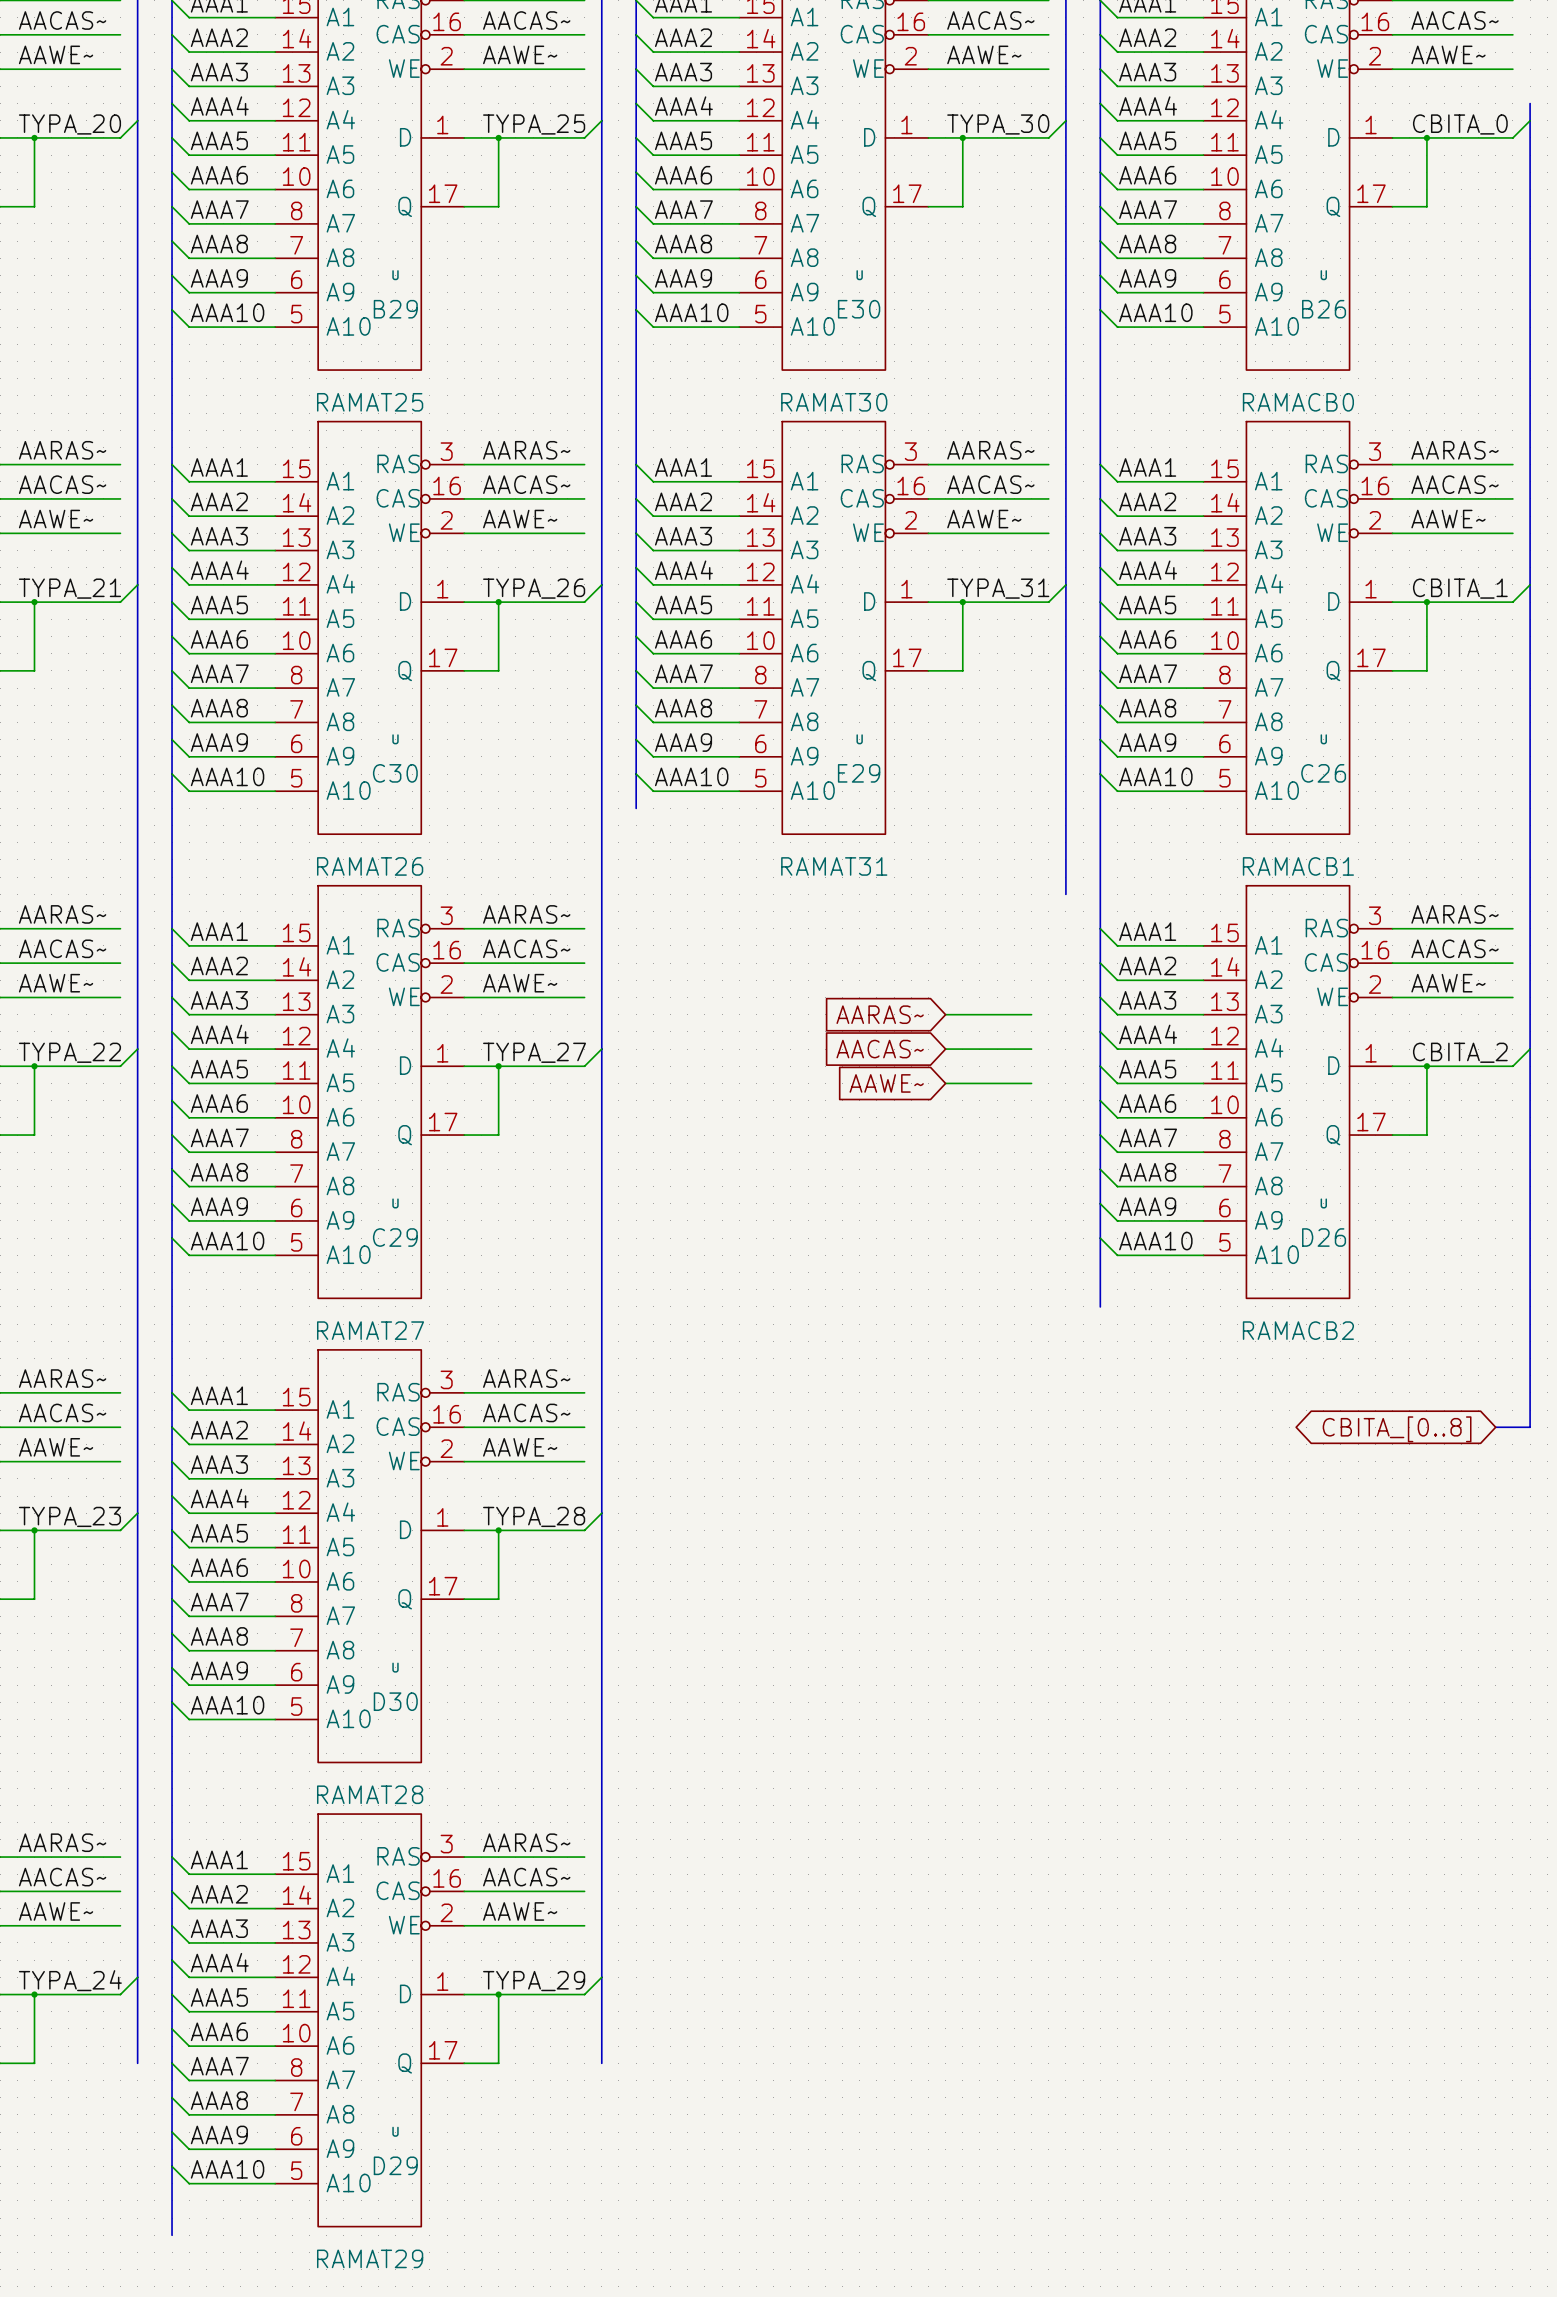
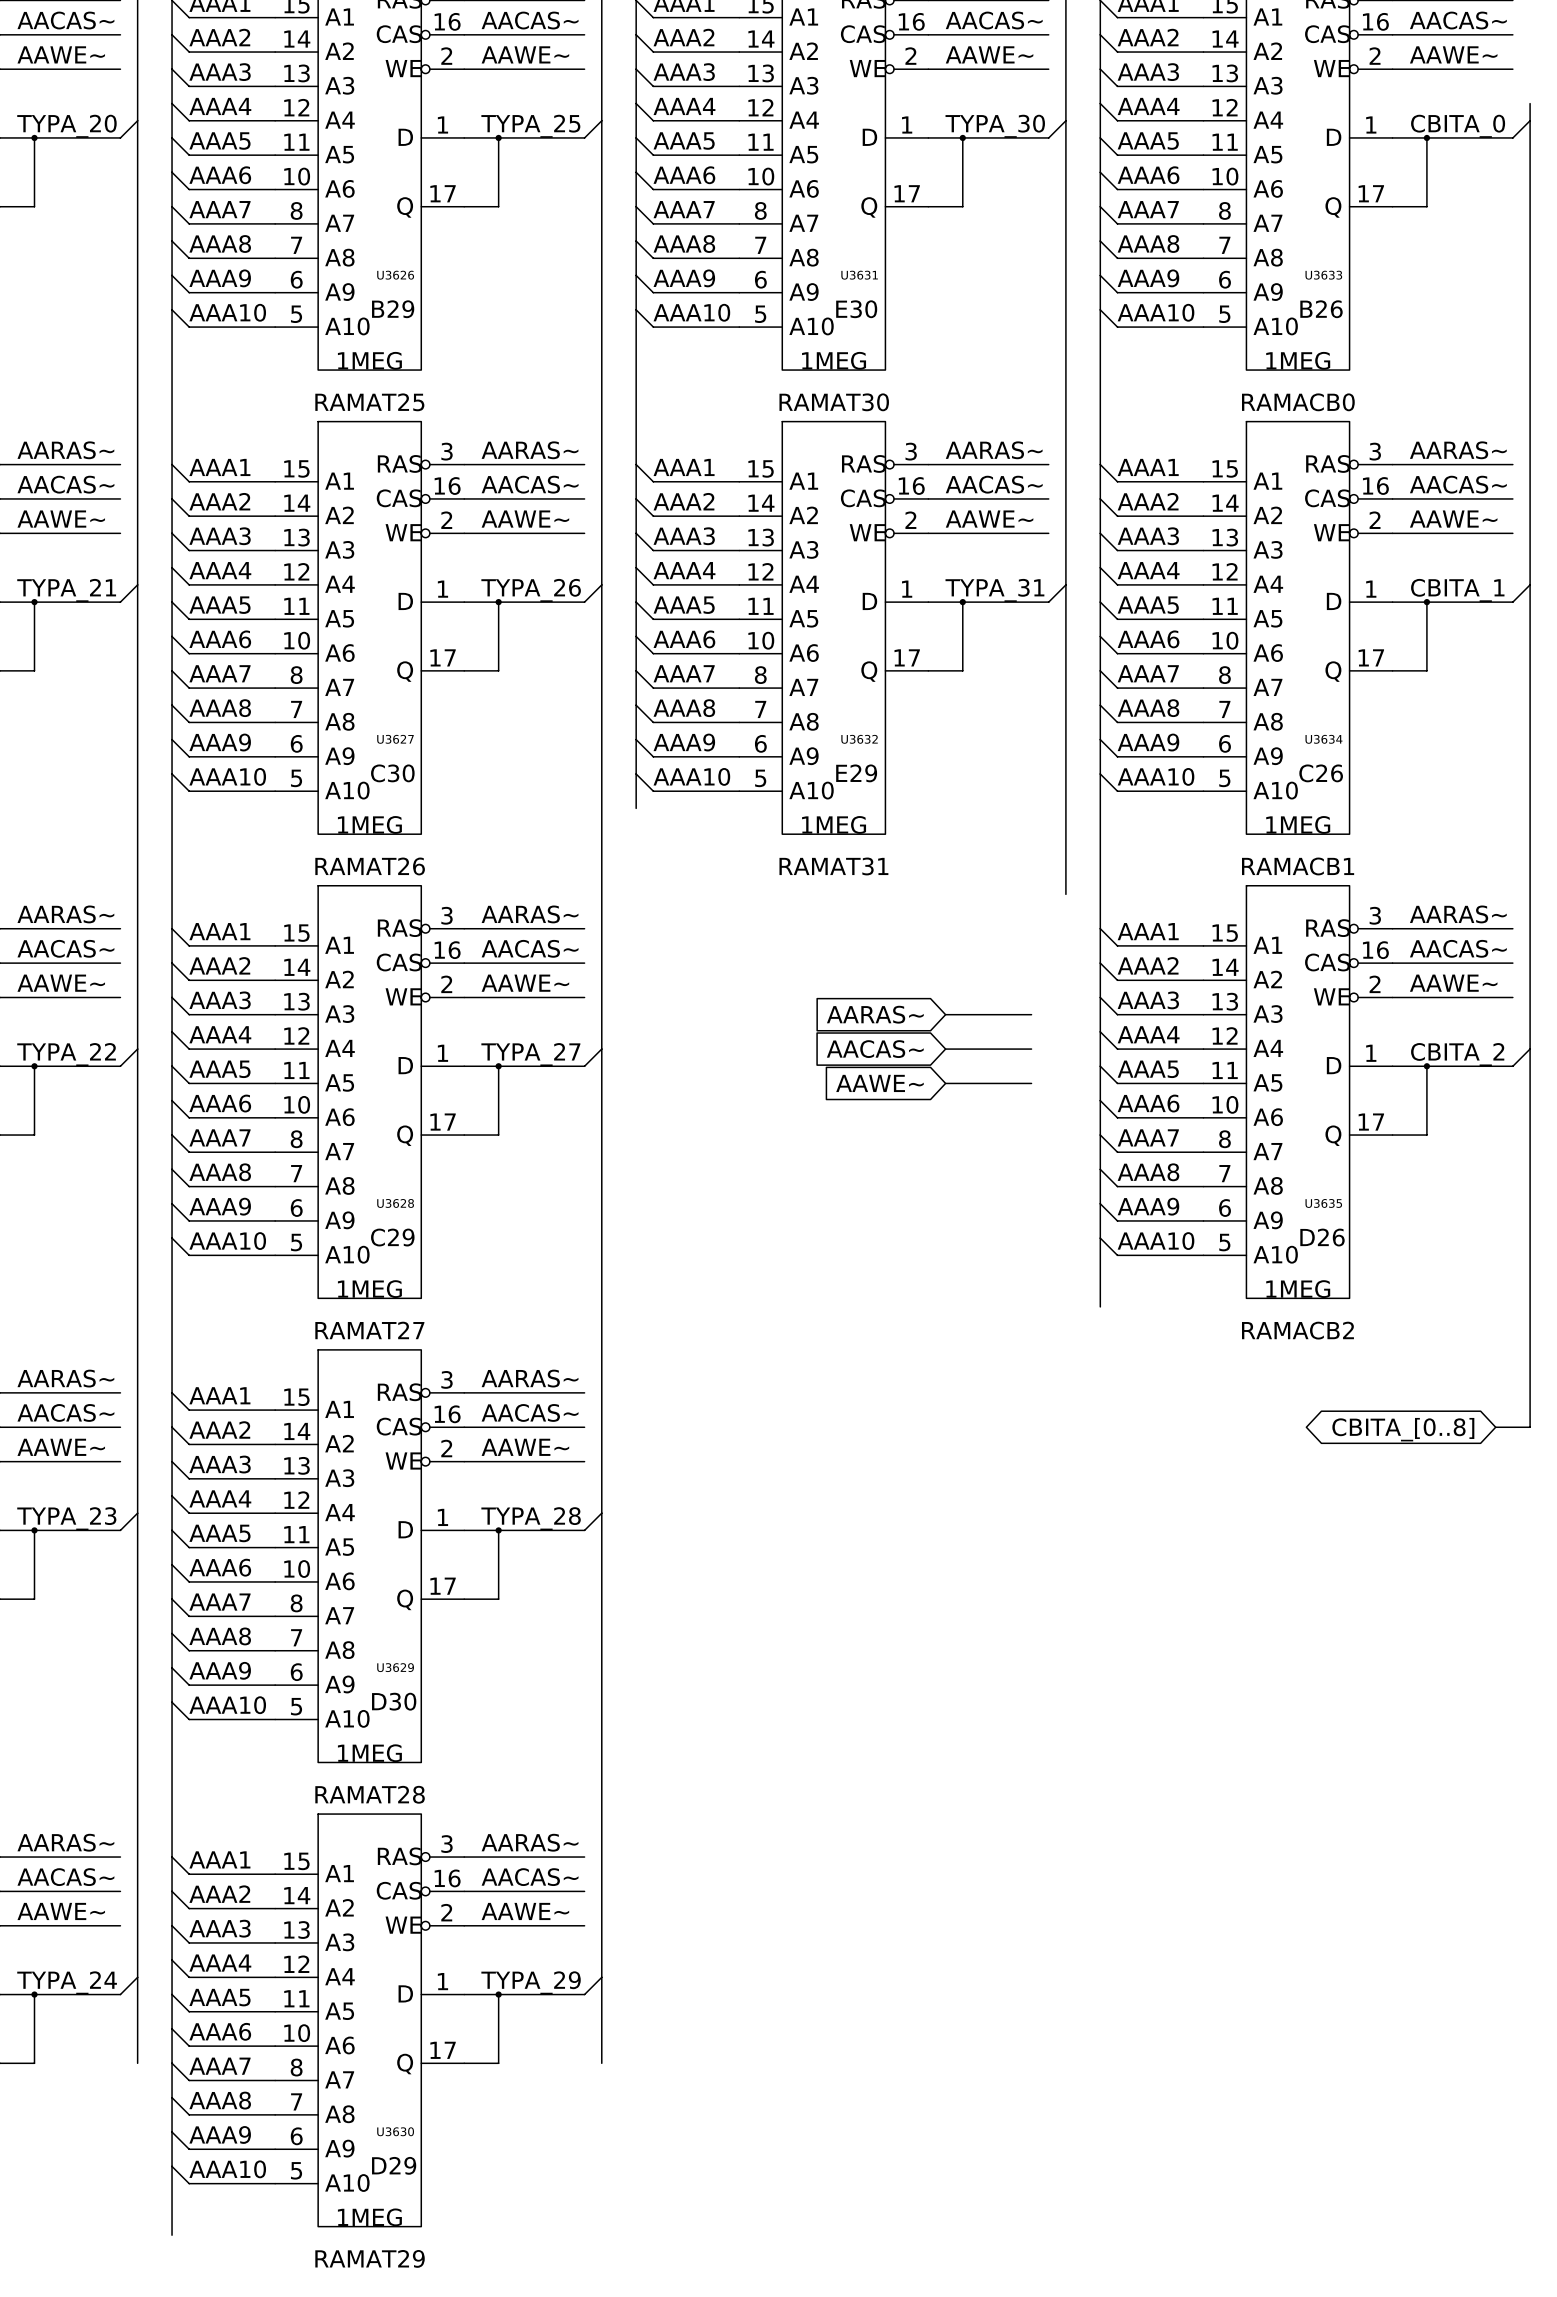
U name: U (395, 275) -> U3626 (395, 275)
U name: U (859, 275) -> U3631 (859, 275)
U name: U (1323, 275) -> U3633 (1323, 275)
U value: none -> 1MEG (369, 360)
U value: none -> 1MEG (834, 360)
U value: none -> 1MEG (1298, 360)
U name: U (395, 739) -> U3627 (395, 739)
U name: U (859, 739) -> U3632 (859, 739)
U name: U (1323, 739) -> U3634 (1323, 739)
U value: none -> 1MEG (369, 824)
U value: none -> 1MEG (834, 824)
U value: none -> 1MEG (1298, 824)
U name: U (395, 1203) -> U3628 (395, 1203)
U name: U (1323, 1203) -> U3635 (1323, 1203)
U value: none -> 1MEG (369, 1289)
U value: none -> 1MEG (1298, 1289)
U name: U (395, 1667) -> U3629 (395, 1667)
U value: none -> 1MEG (369, 1753)
U name: U (395, 2131) -> U3630 (395, 2131)
U value: none -> 1MEG (369, 2217)

